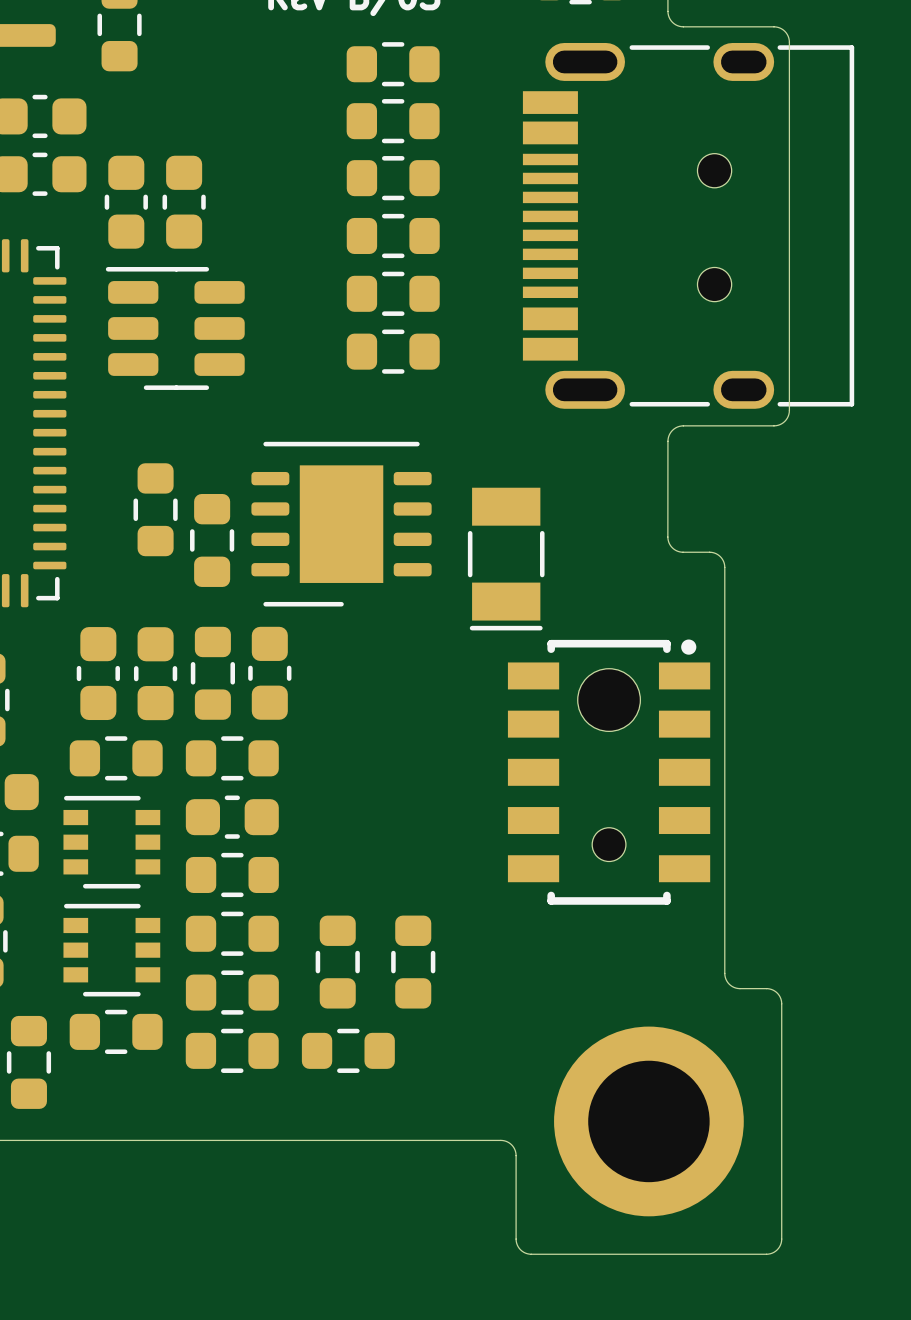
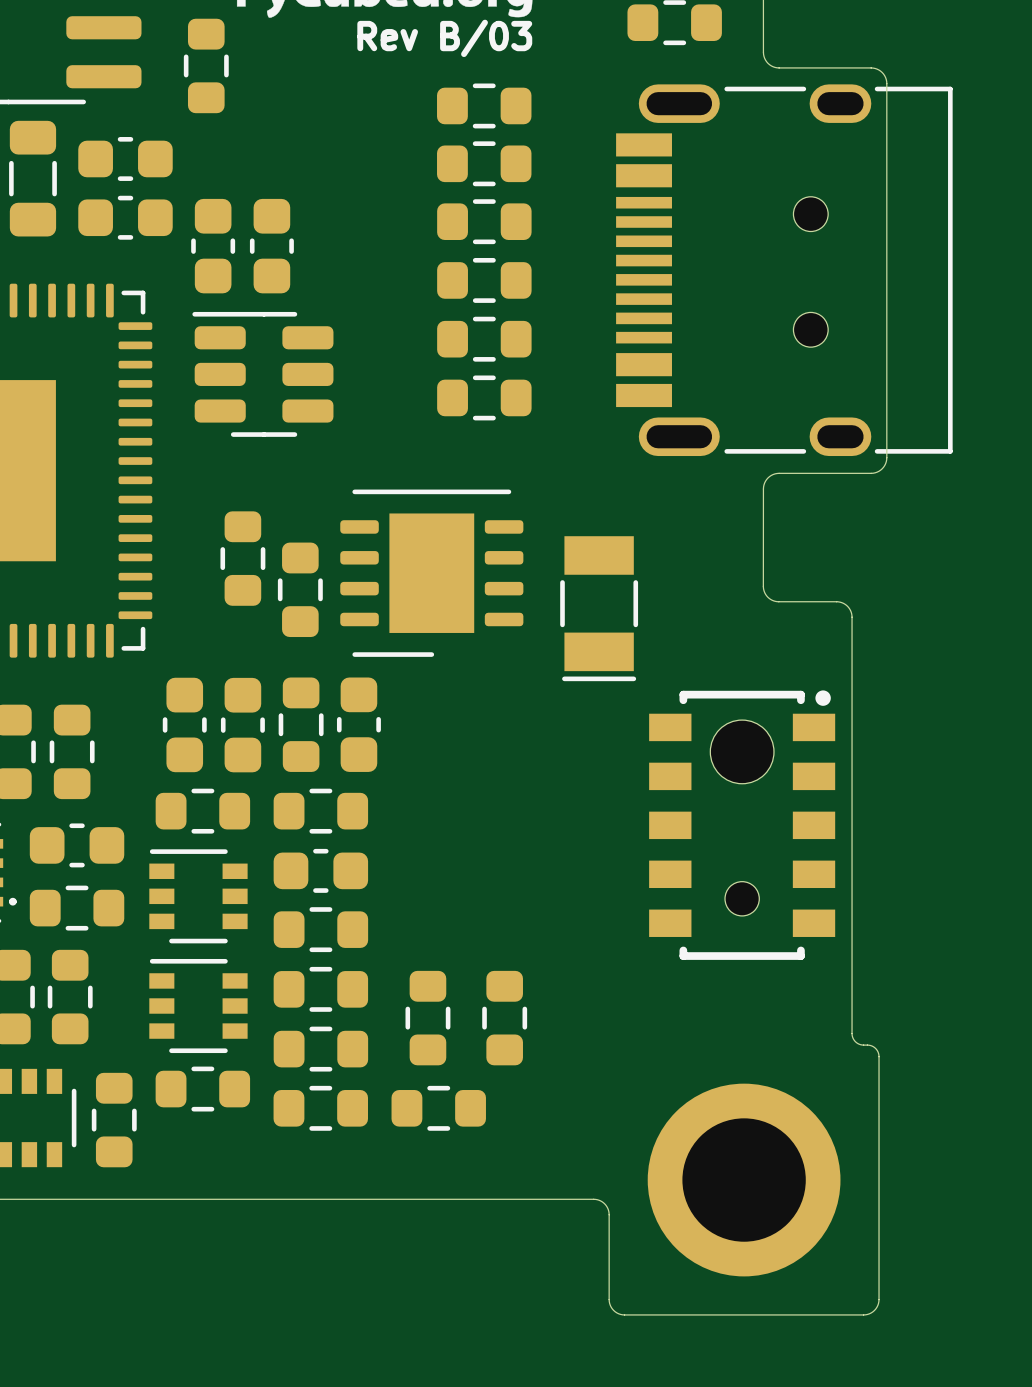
board edge: (709, 552) (720, 556) (724, 567) (724, 975) (729, 984) (736, 988) (773, 990) (779, 995) (781, 1003) -> (805, 601) (841, 602) (848, 607) (851, 615) (852, 1033) (853, 1039) (857, 1043) (870, 1045) (875, 1048) (879, 1060)
part footprint: [507, 639, 711, 905] -> [649, 690, 836, 960]

